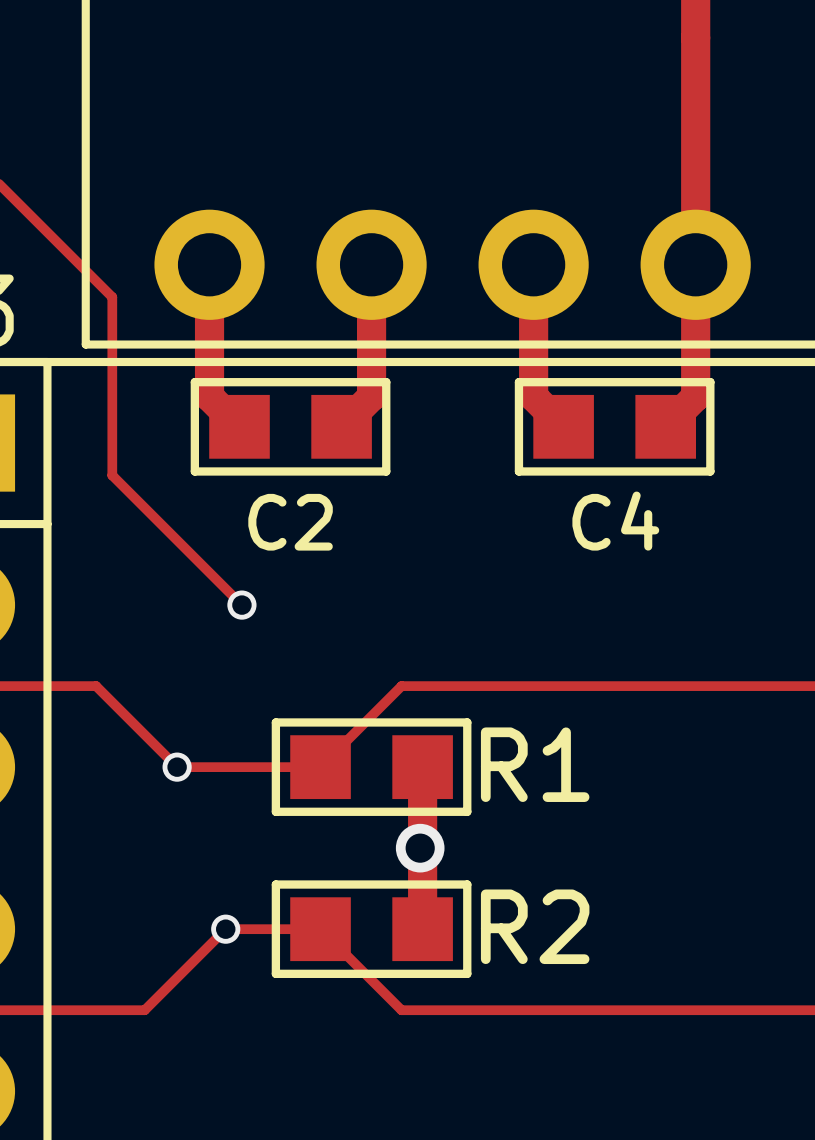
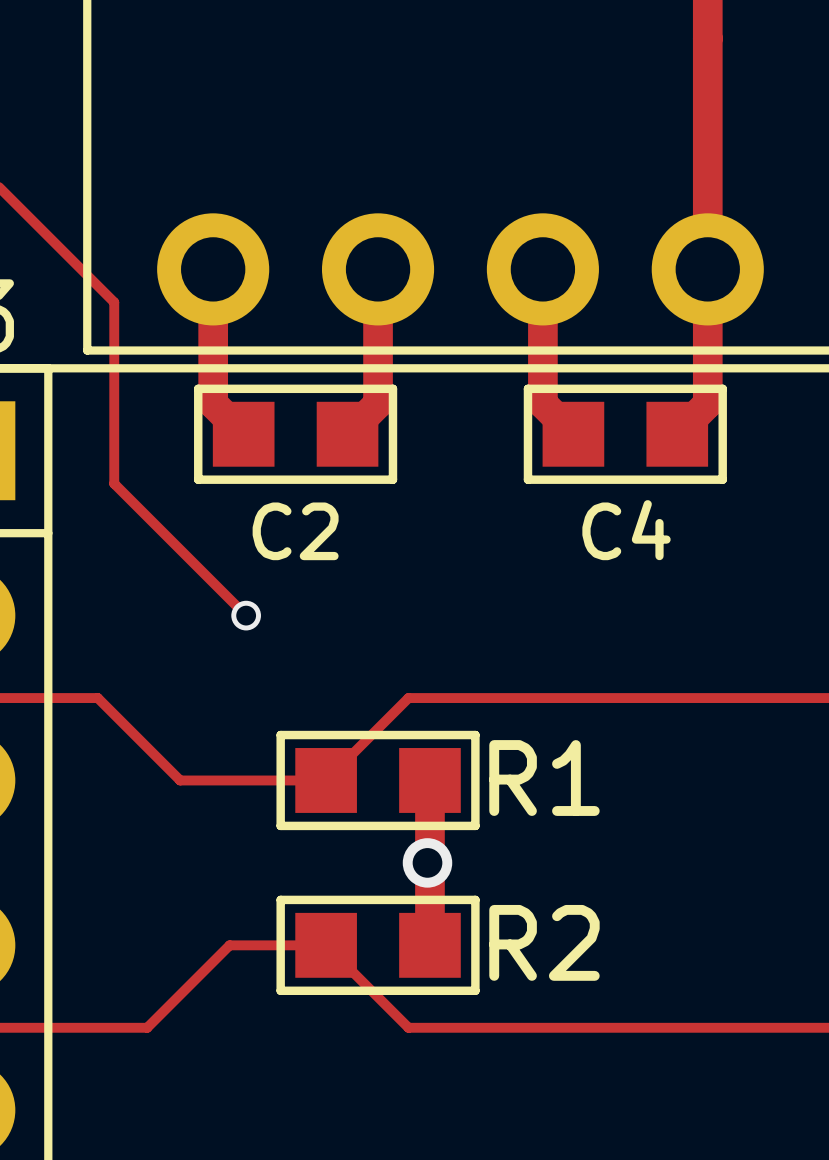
via: (177, 767) -> none
via: (225, 929) -> none

